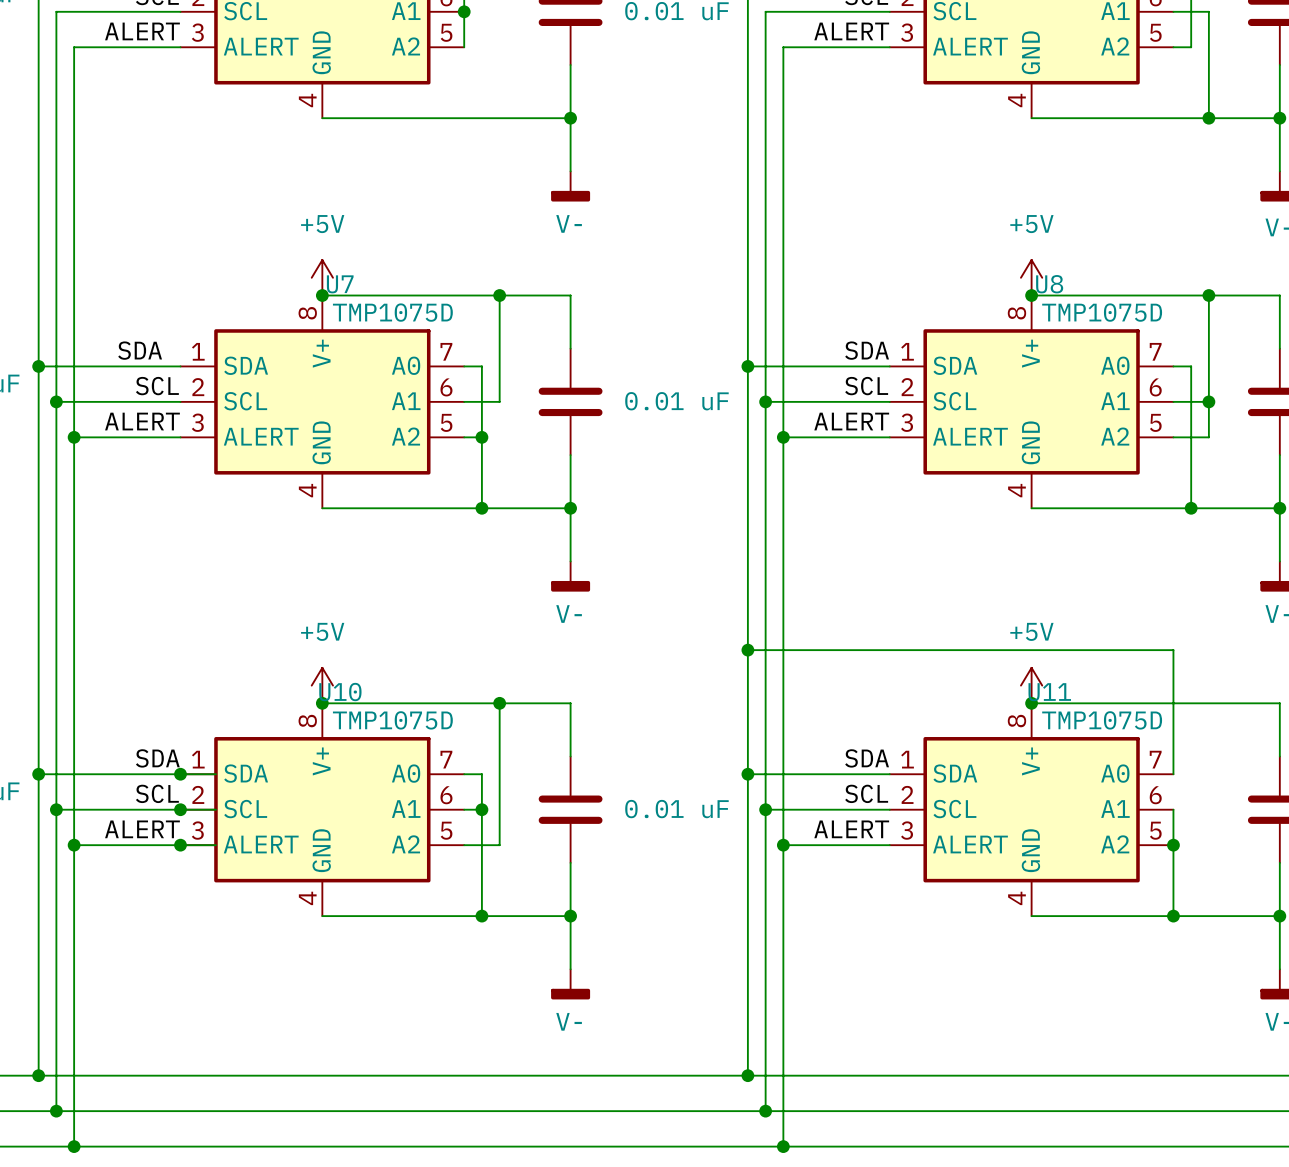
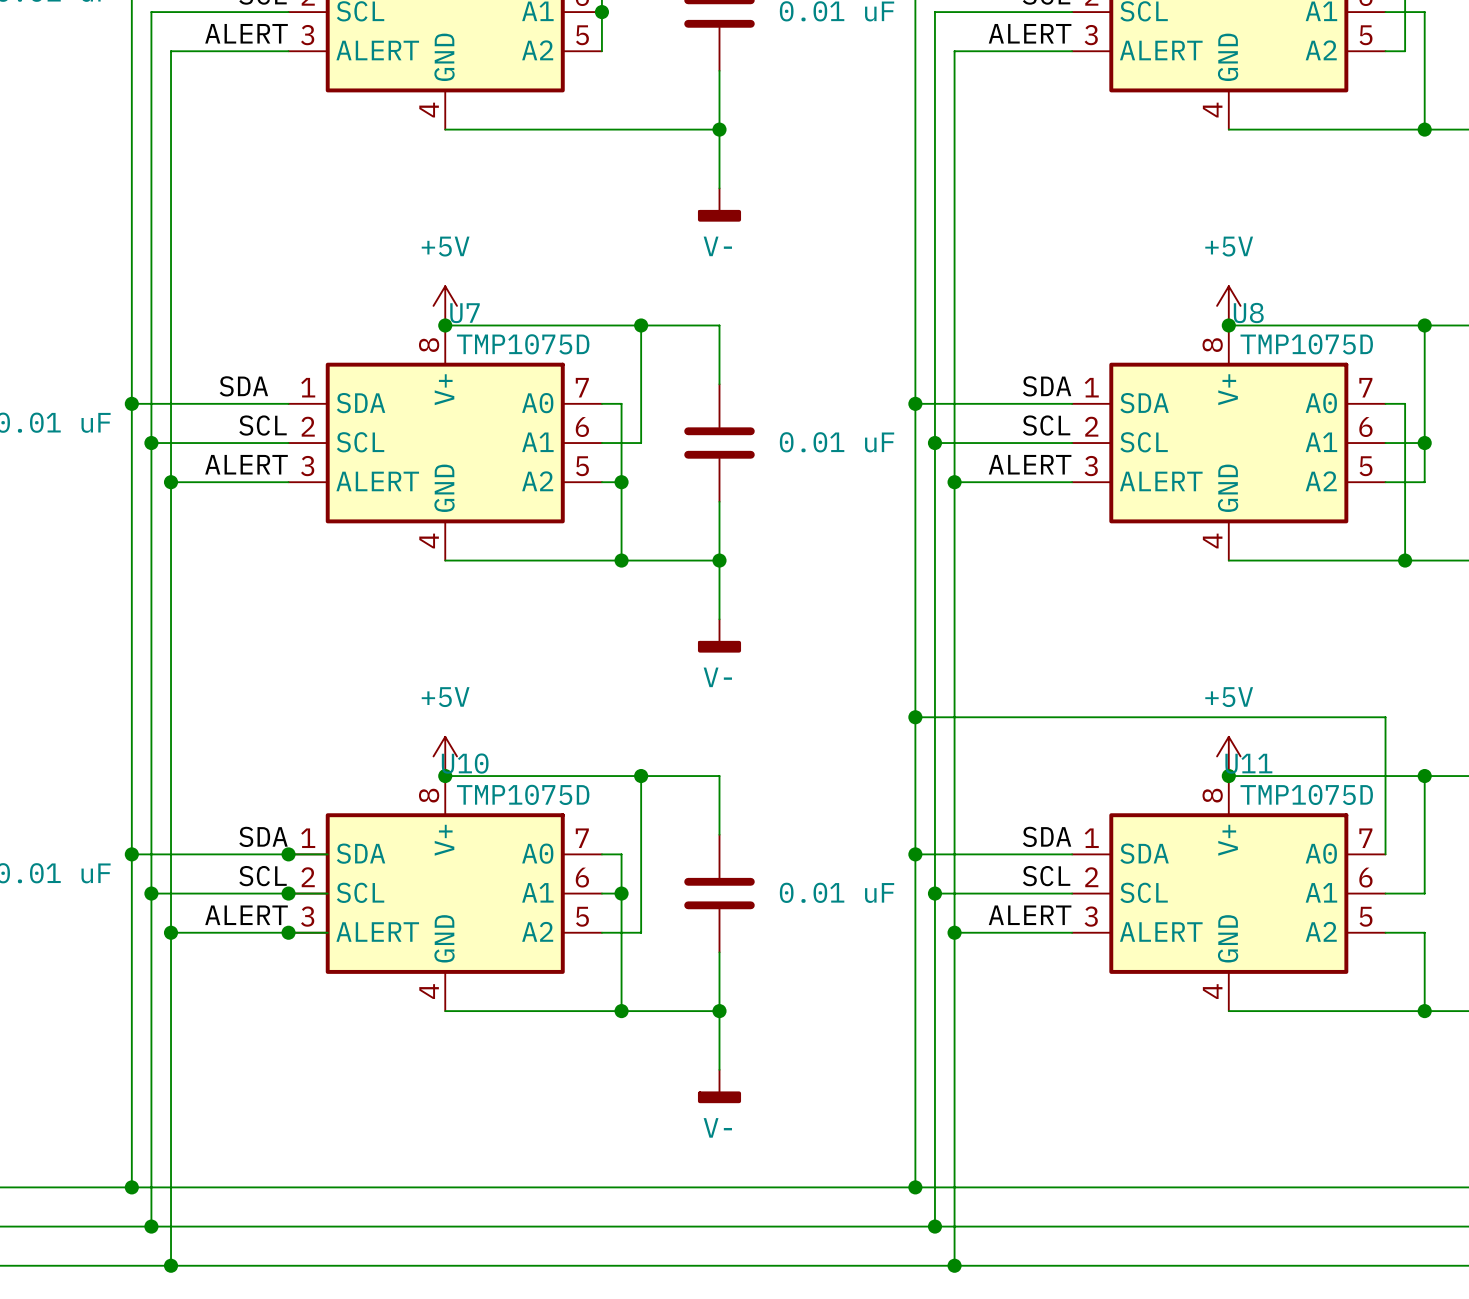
junction: none -> (1424, 776)
wire: (1173, 809) (1173, 916) -> (1385, 893) (1424, 893) (1424, 776)
wire: none -> (1385, 932) (1424, 932) (1424, 1011)
junction: (1173, 845) -> none
junction position: (1173, 916) -> (1424, 1011)

